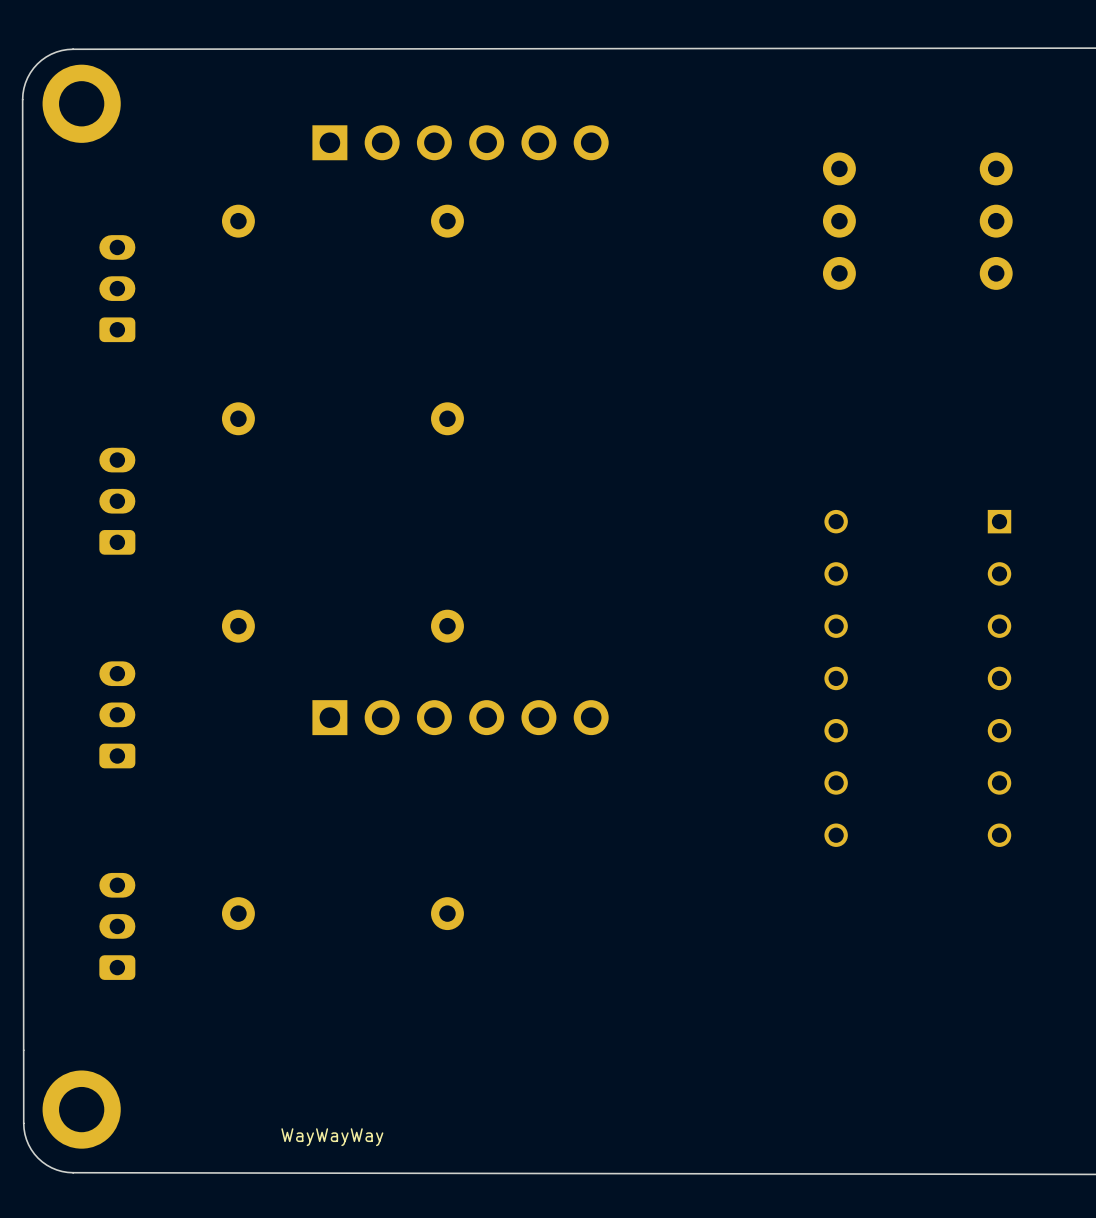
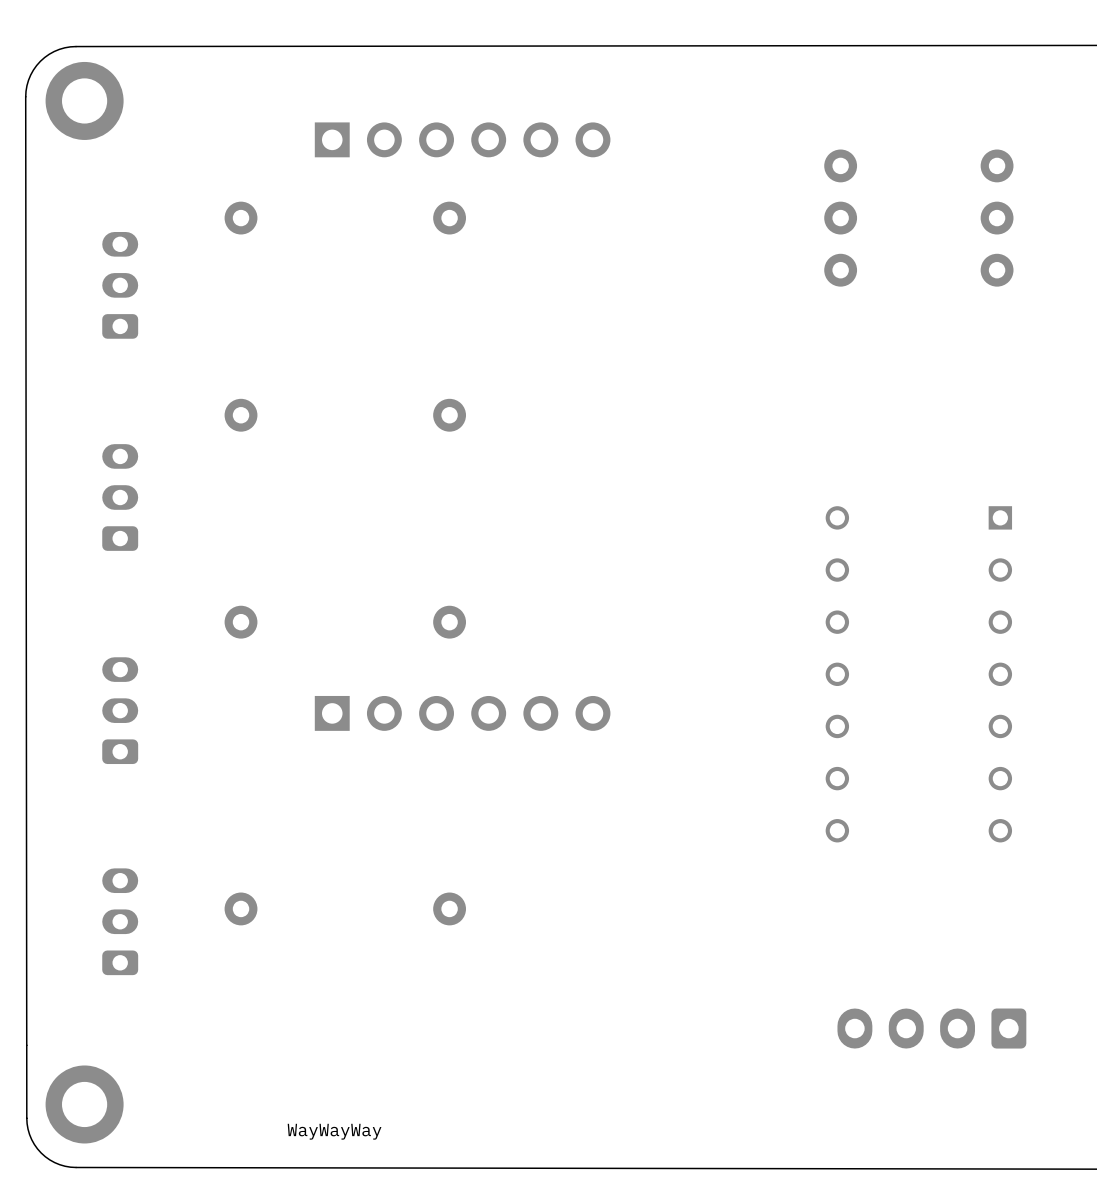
part: none -> (931, 1028)

